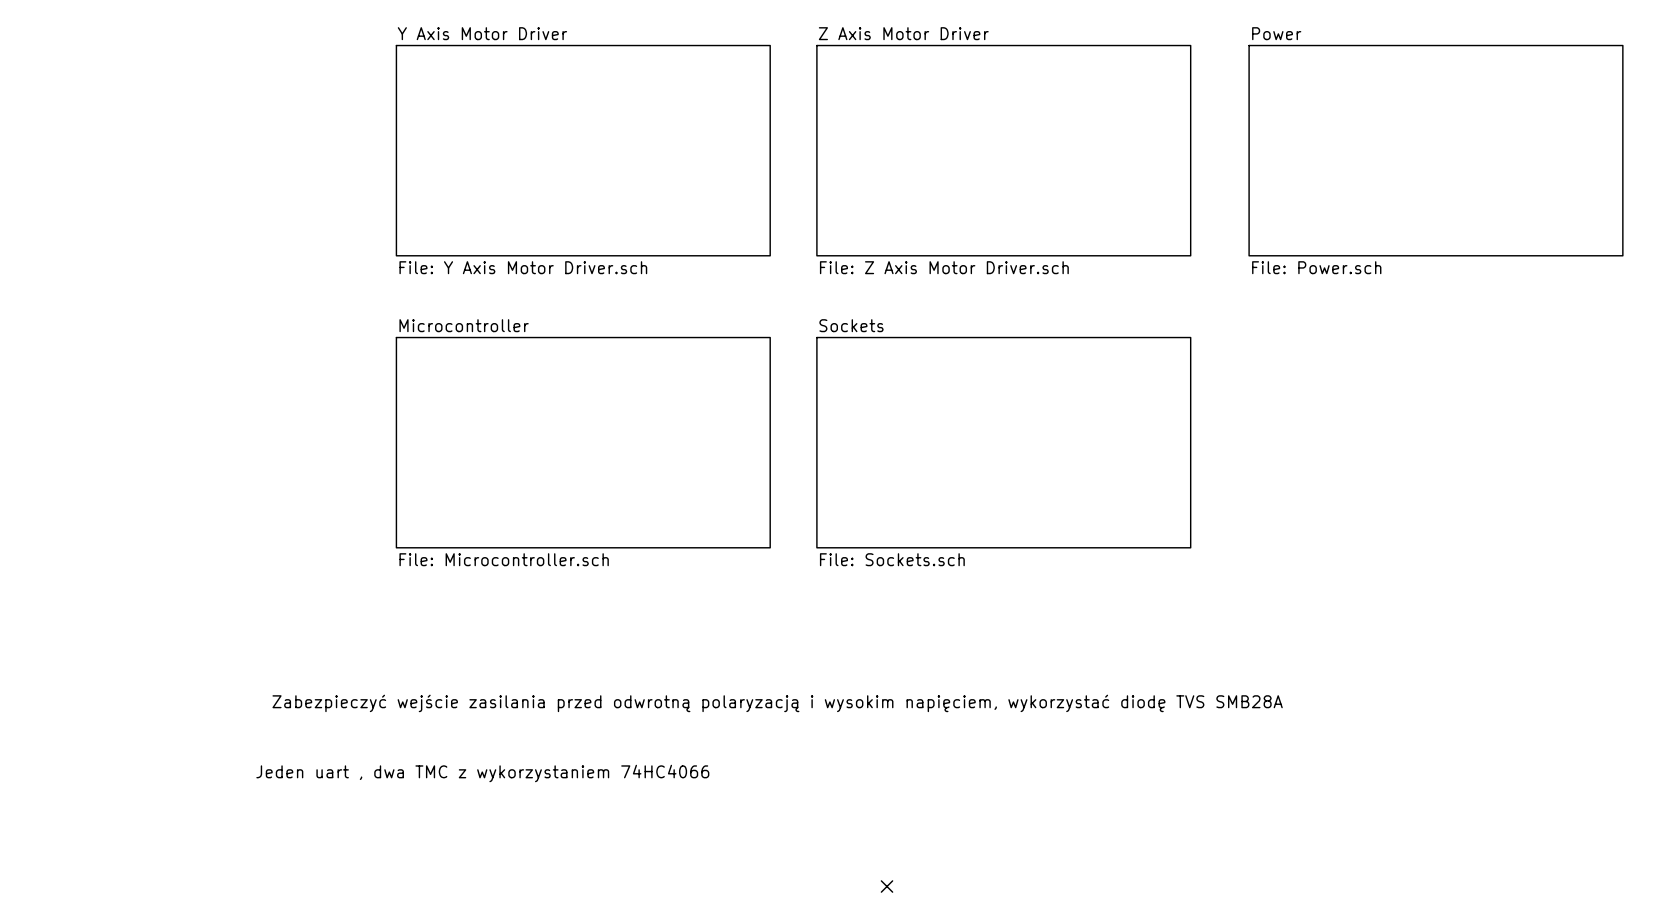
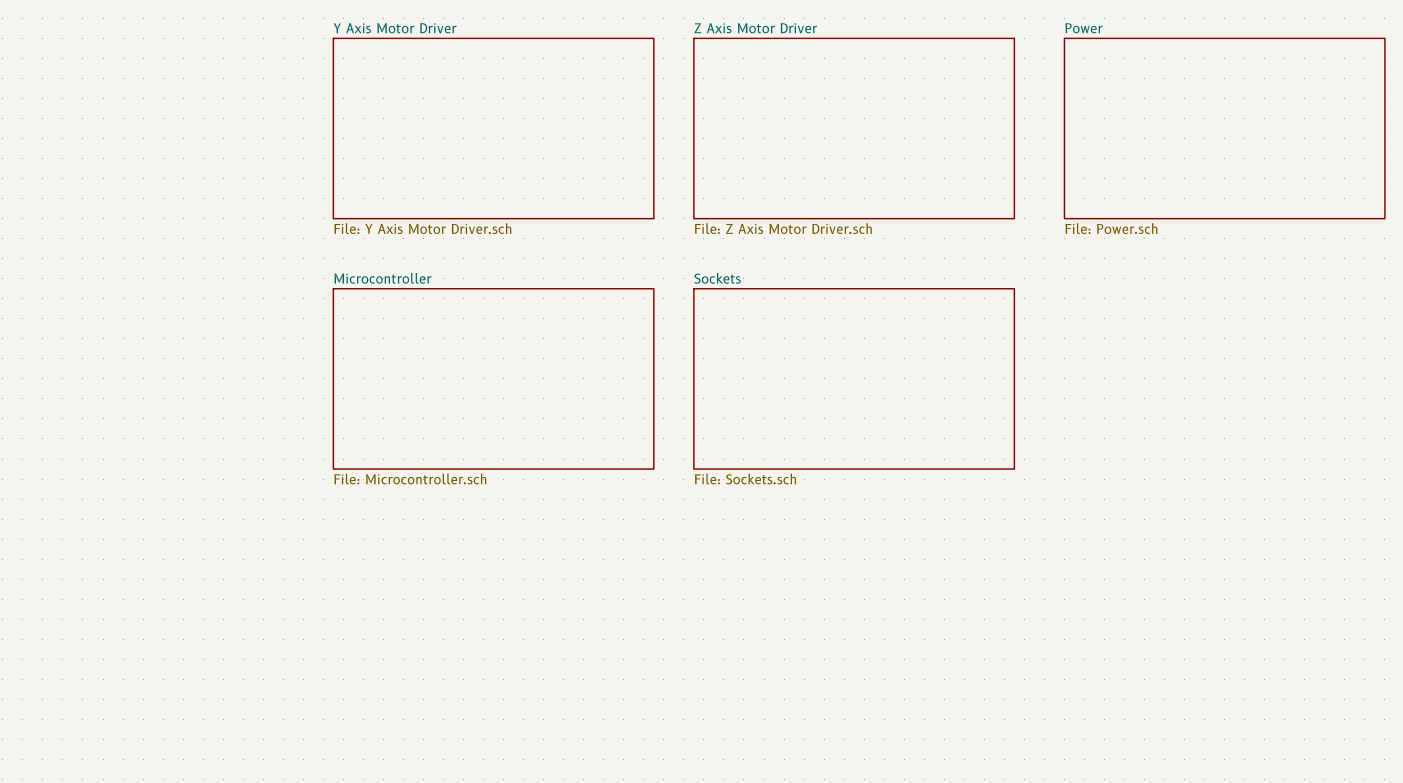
text: Zabezpieczyć wejście zasilania przed odwrotną polaryzacją i wysokim napięciem, wykorzystać diodę TVS SMB28A (777, 703) -> none
text: Jeden uart , dwa TMC z wykorzystaniem 74HC4066 (482, 773) -> none
no-connect mark: (886, 886) -> none

